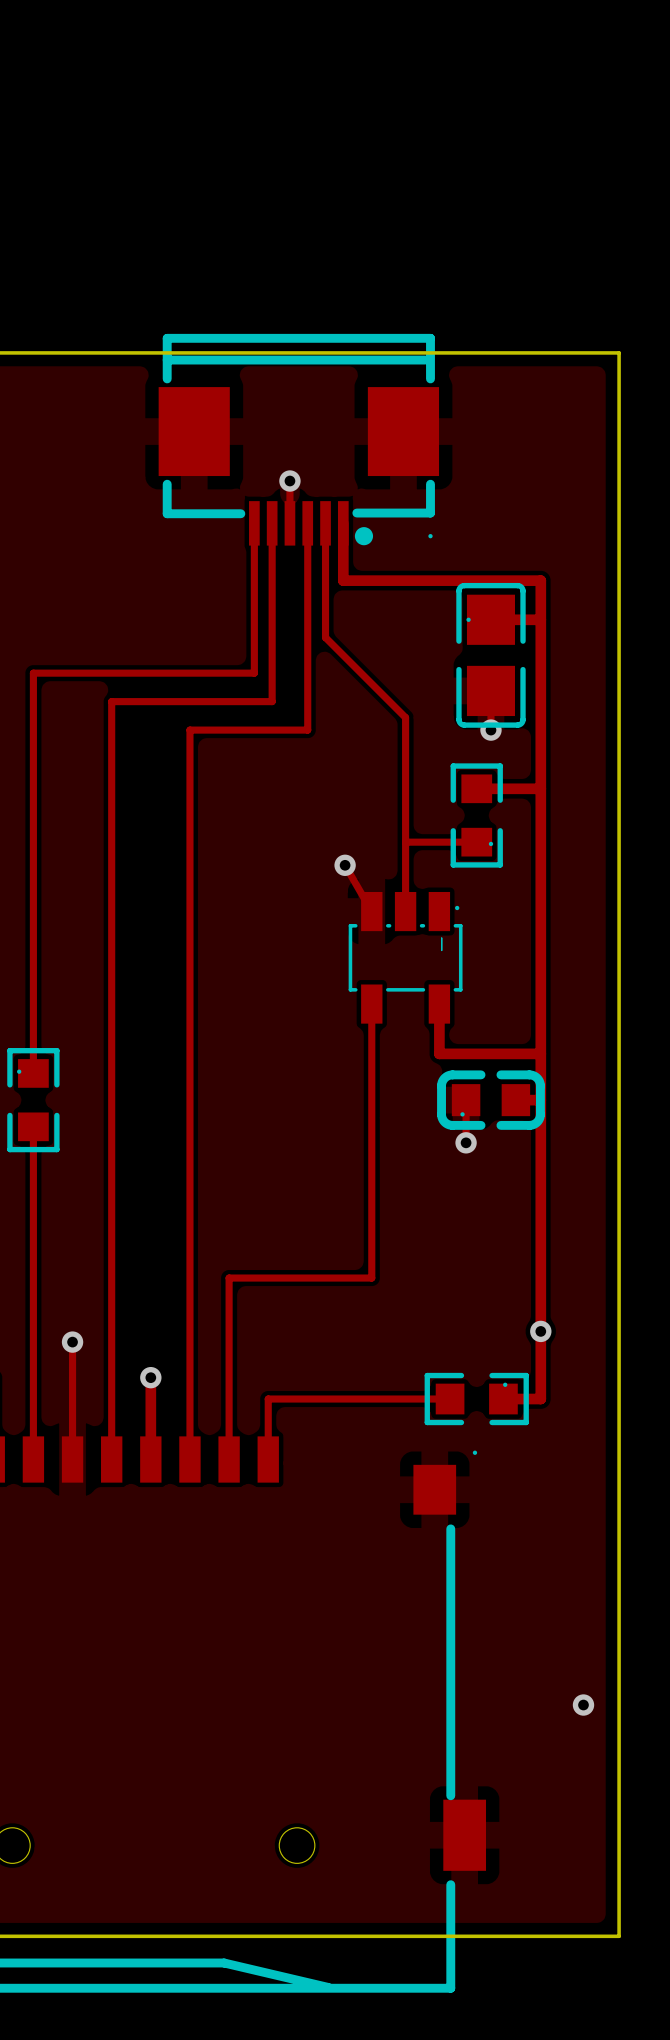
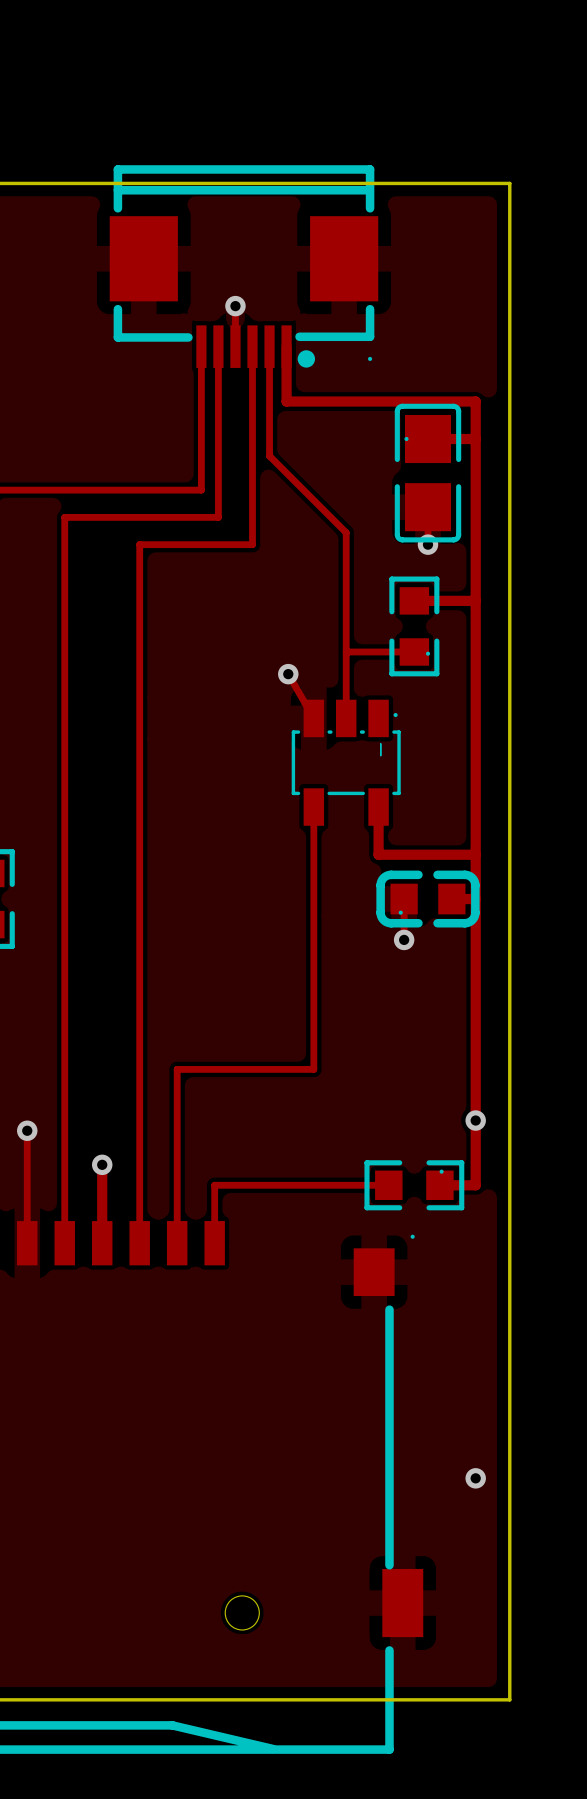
board edge: (576, 352) (619, 352) (619, 1936) (576, 1936) -> (509, 183) (509, 1699)
via position: (583, 1705) -> (475, 1478)

